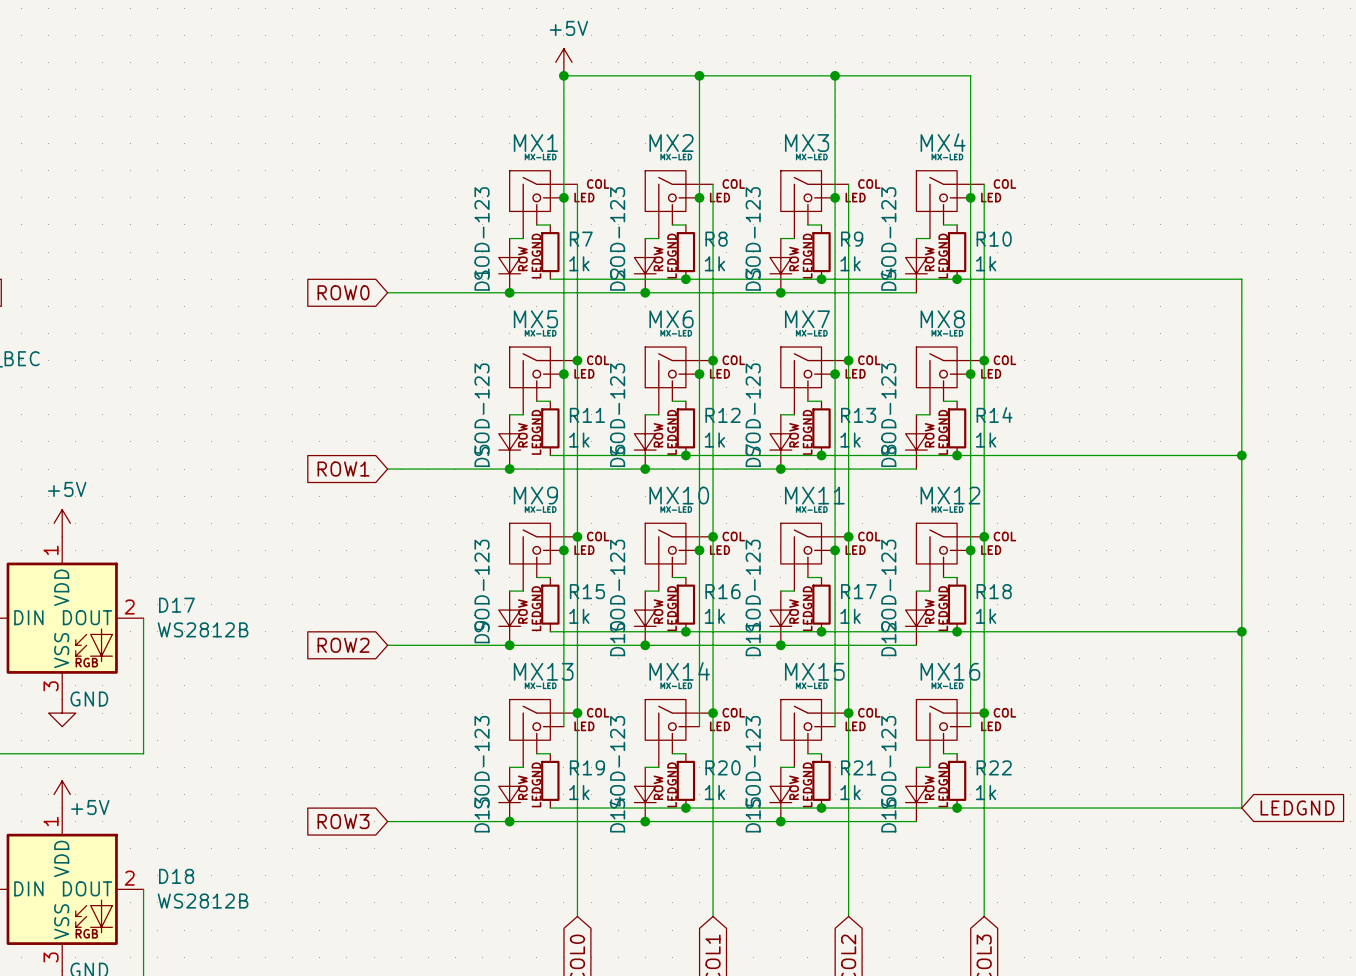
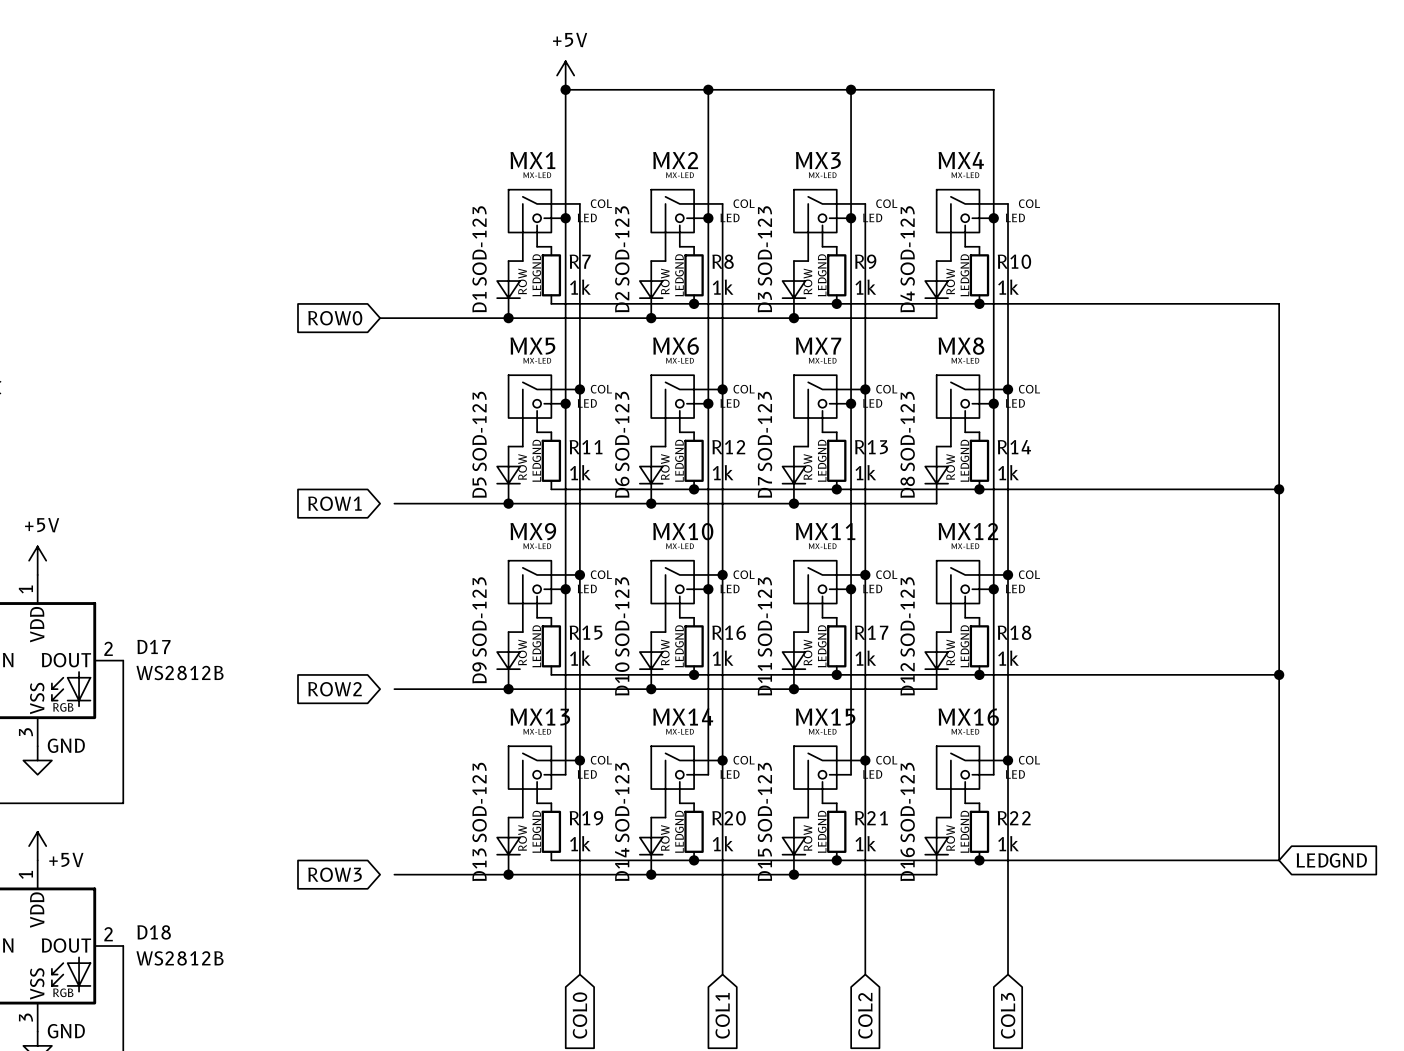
wire: (387, 469) (401, 469) -> none
wire: (387, 645) (401, 645) -> none
wire: (387, 821) (401, 821) -> none

